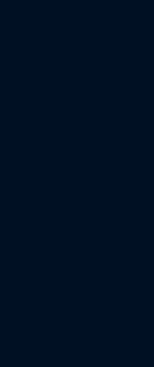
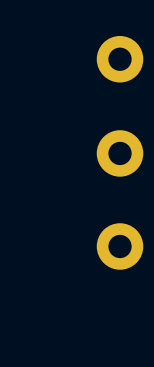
part: none -> (120, 59)
part: none -> (120, 153)
part: none -> (120, 246)

